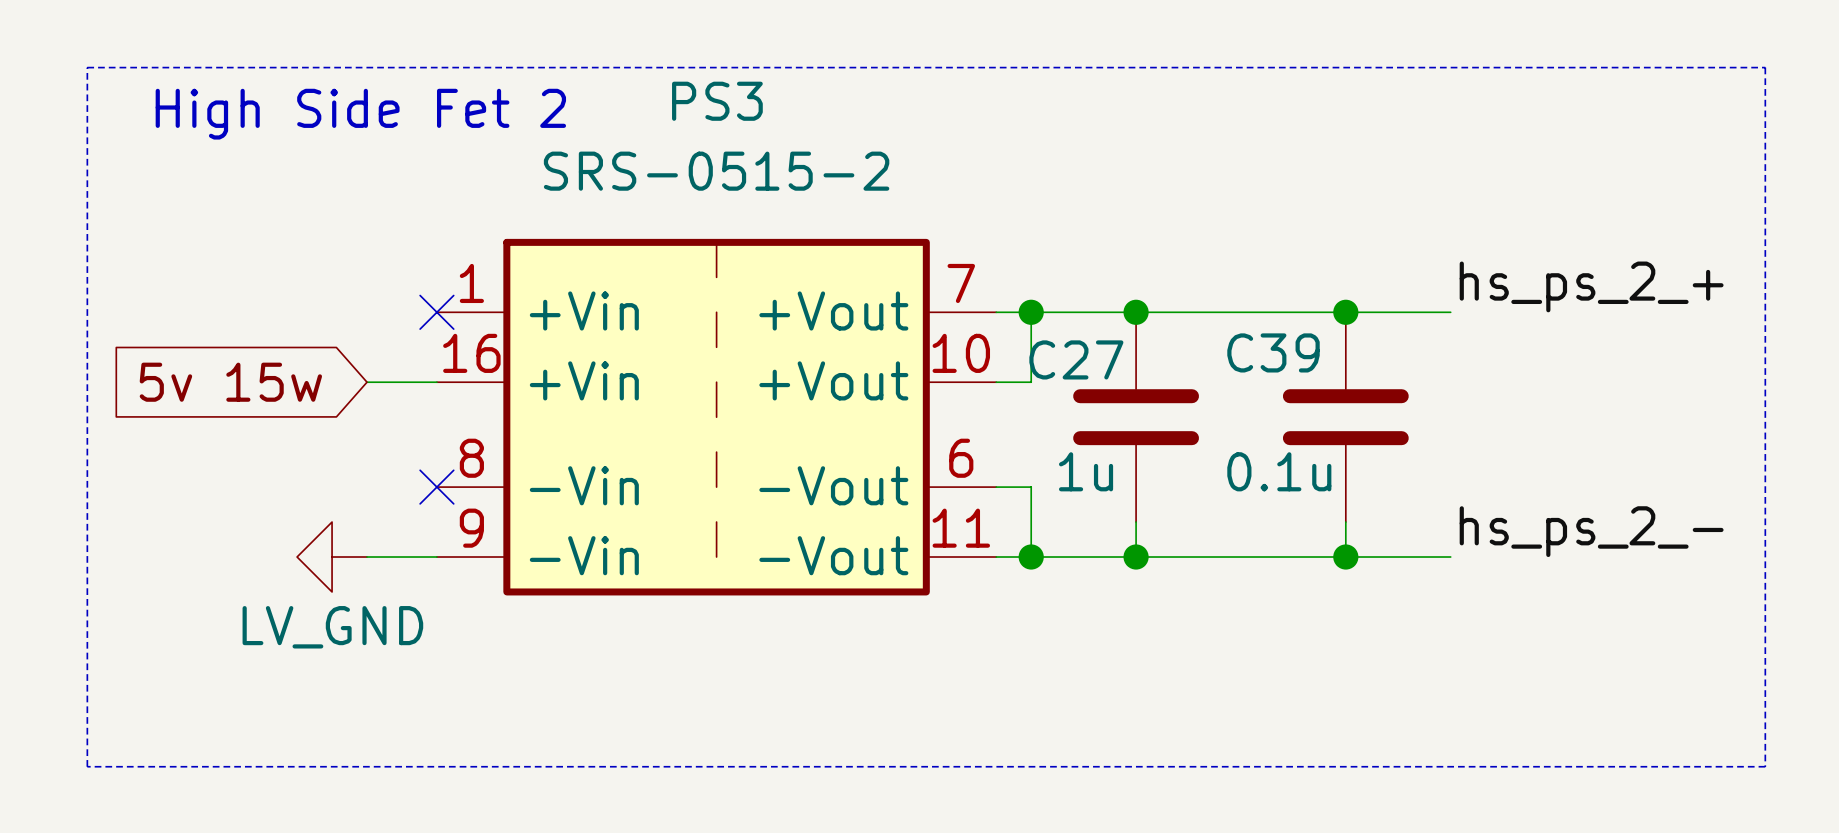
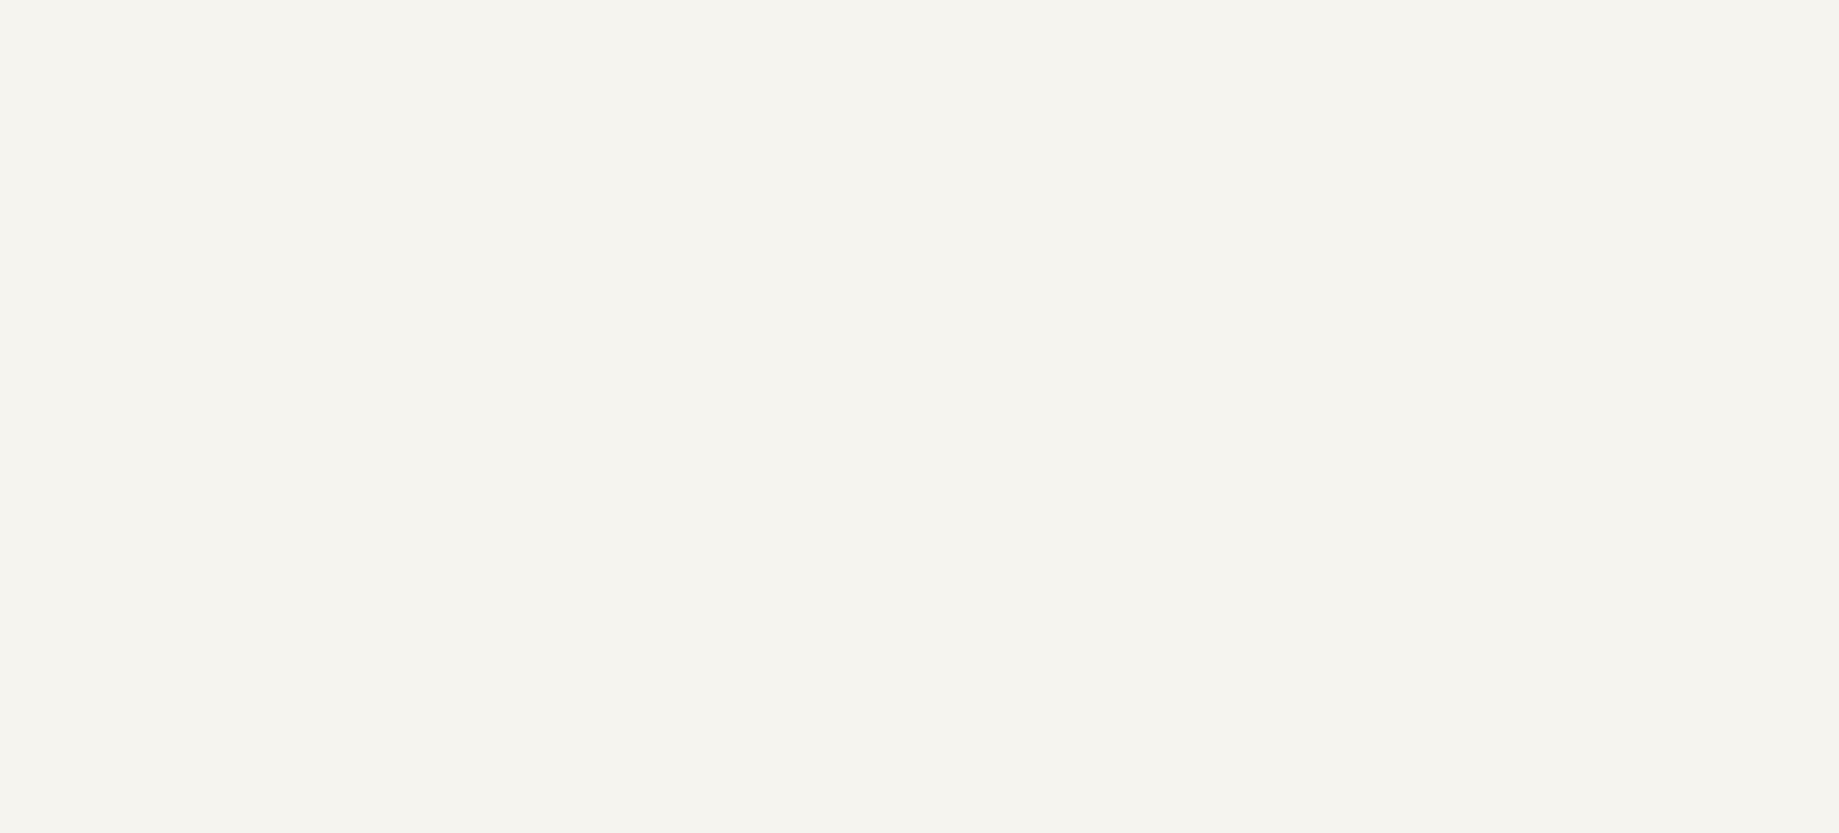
line: (87, 67) (1765, 67) (1765, 766) (87, 766) (87, 67) -> none
text: High Side Fet 2 (360, 114) -> none
label: hs_ps_2_+ (1591, 286) -> none
no-connect mark: (436, 312) -> none
wire: (996, 312) (1450, 312) -> none
wire: (1031, 312) (1031, 382) (996, 382) -> none
junction: (1031, 312) -> none
junction: (1136, 312) -> none
junction: (1345, 312) -> none
global label: 5v 15w (230, 382) -> none
wire: (367, 382) (436, 382) -> none
PS3: SRS-0515-2 (716, 417) -> none
C27: 1u (1136, 417) -> none
C39: 0.1u (1345, 417) -> none
no-connect mark: (436, 487) -> none
wire: (996, 487) (1031, 487) (1031, 557) -> none
wire: (1136, 522) (1136, 557) -> none
wire: (1345, 522) (1345, 557) -> none
label: hs_ps_2_- (1591, 531) -> none
power symbol: LV_GND (332, 557) -> none
wire: (367, 557) (436, 557) -> none
wire: (996, 557) (1450, 557) -> none
junction: (1031, 557) -> none
junction: (1136, 557) -> none
junction: (1345, 557) -> none

